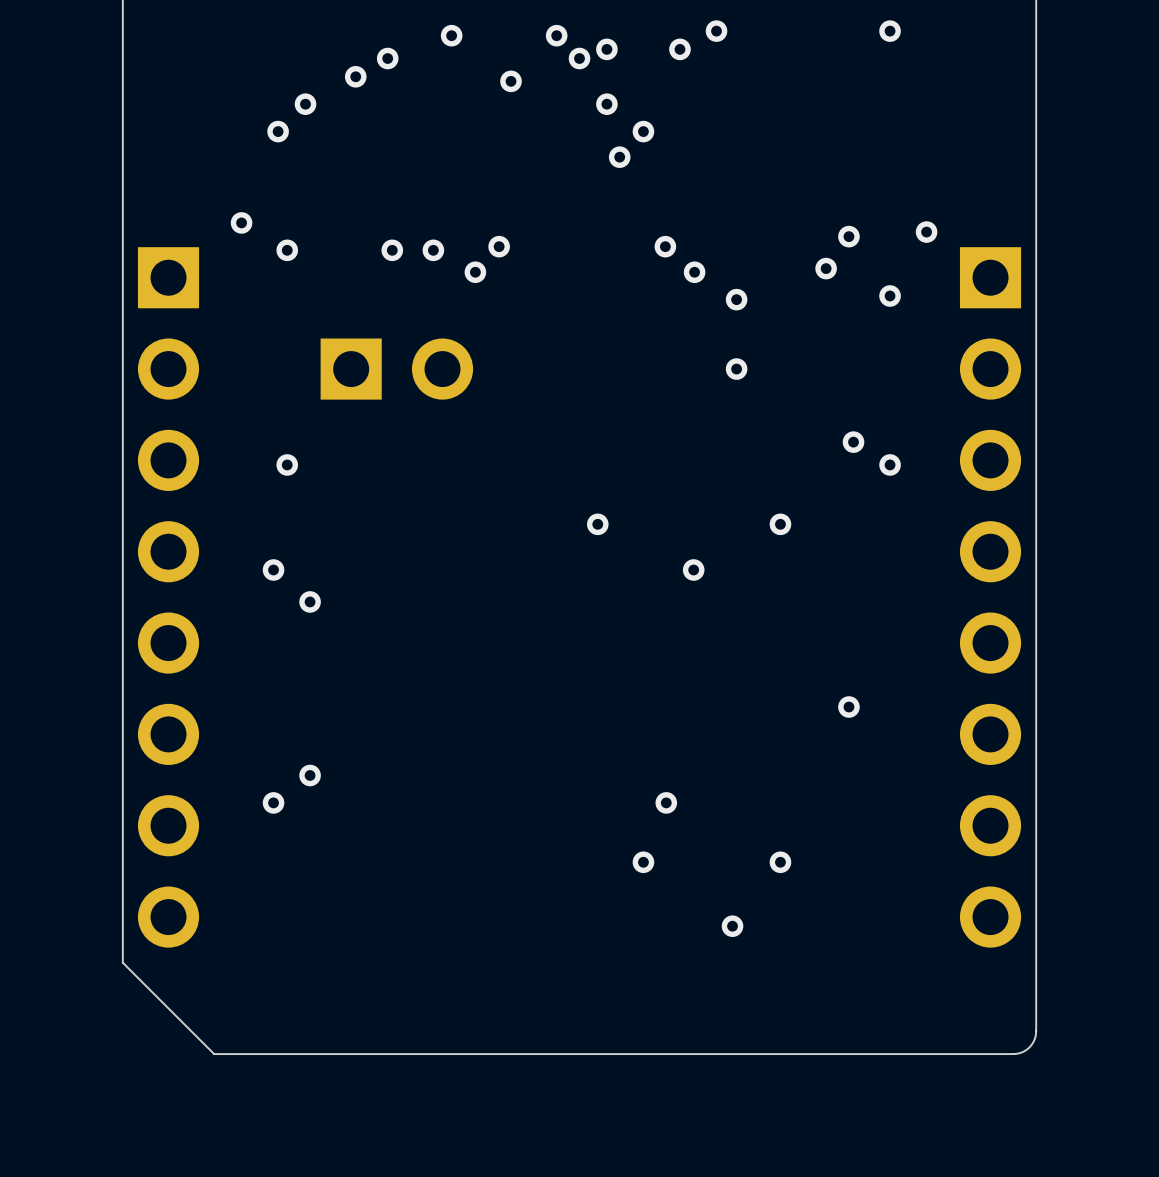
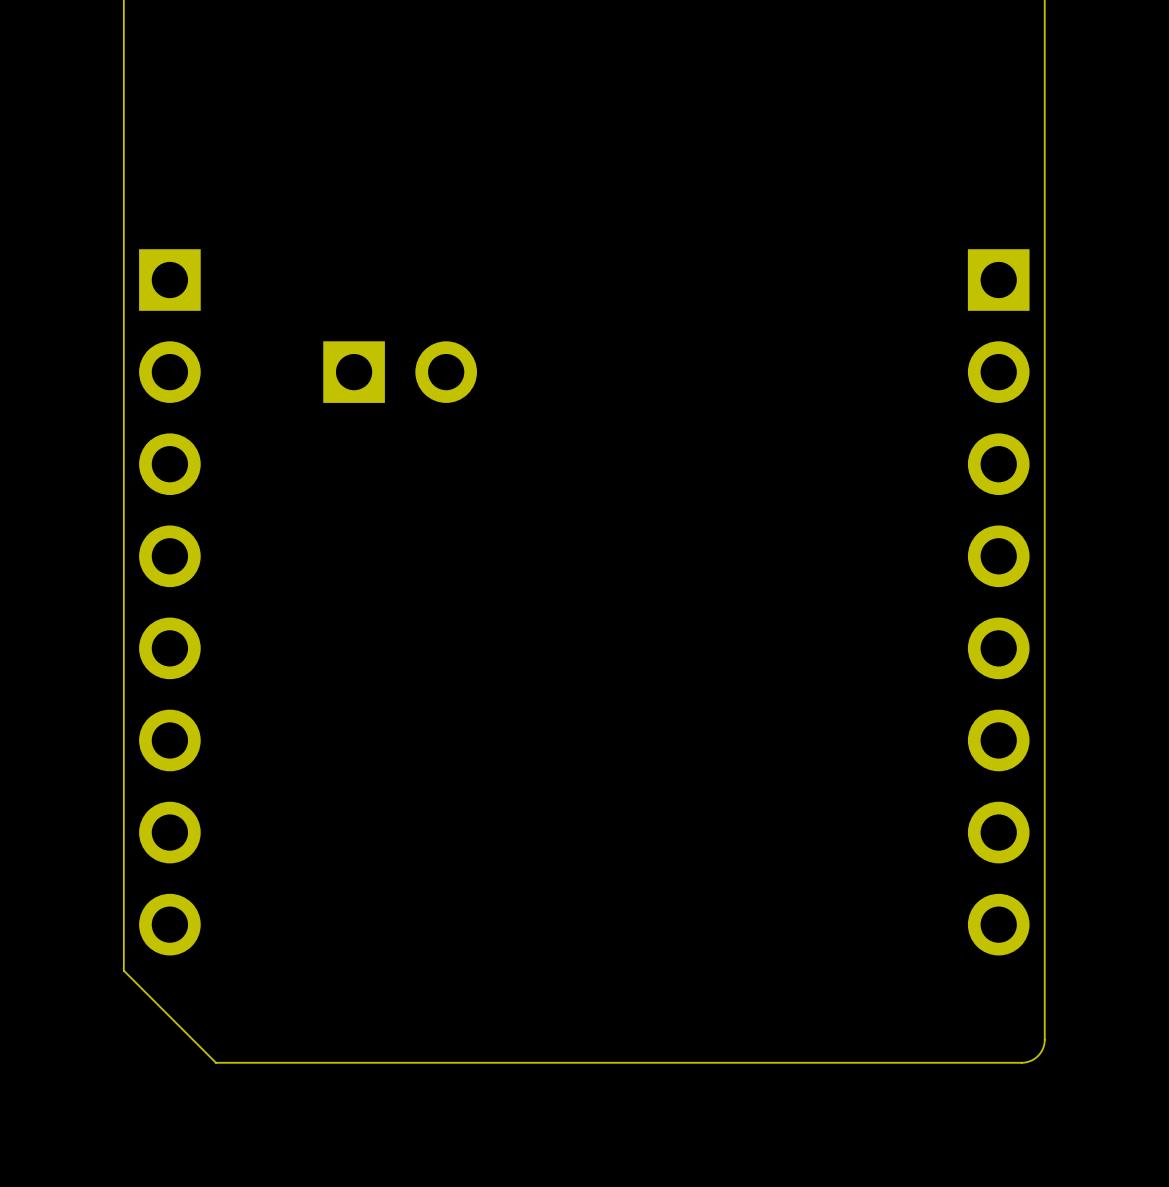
via: (716, 31) -> none
via: (890, 31) -> none
via: (451, 35) -> none
via: (556, 35) -> none
via: (606, 49) -> none
via: (679, 49) -> none
via: (387, 58) -> none
via: (579, 58) -> none
via: (355, 76) -> none
via: (511, 81) -> none
via: (305, 104) -> none
via: (606, 104) -> none
via: (278, 131) -> none
via: (643, 131) -> none
via: (619, 157) -> none
via: (241, 222) -> none
via: (926, 232) -> none
via: (848, 236) -> none
via: (499, 246) -> none
via: (665, 246) -> none
via: (287, 250) -> none
via: (392, 250) -> none
via: (433, 250) -> none
via: (826, 268) -> none
via: (475, 272) -> none
via: (694, 272) -> none
via: (890, 295) -> none
via: (736, 299) -> none
via: (736, 369) -> none
via: (853, 442) -> none
via: (287, 464) -> none
via: (890, 464) -> none
via: (597, 524) -> none
via: (780, 524) -> none
via: (273, 569) -> none
via: (693, 569) -> none
via: (310, 601) -> none
via: (848, 707) -> none
via: (310, 775) -> none
via: (273, 802) -> none
via: (666, 802) -> none
via: (643, 862) -> none
via: (780, 862) -> none
via: (732, 926) -> none

